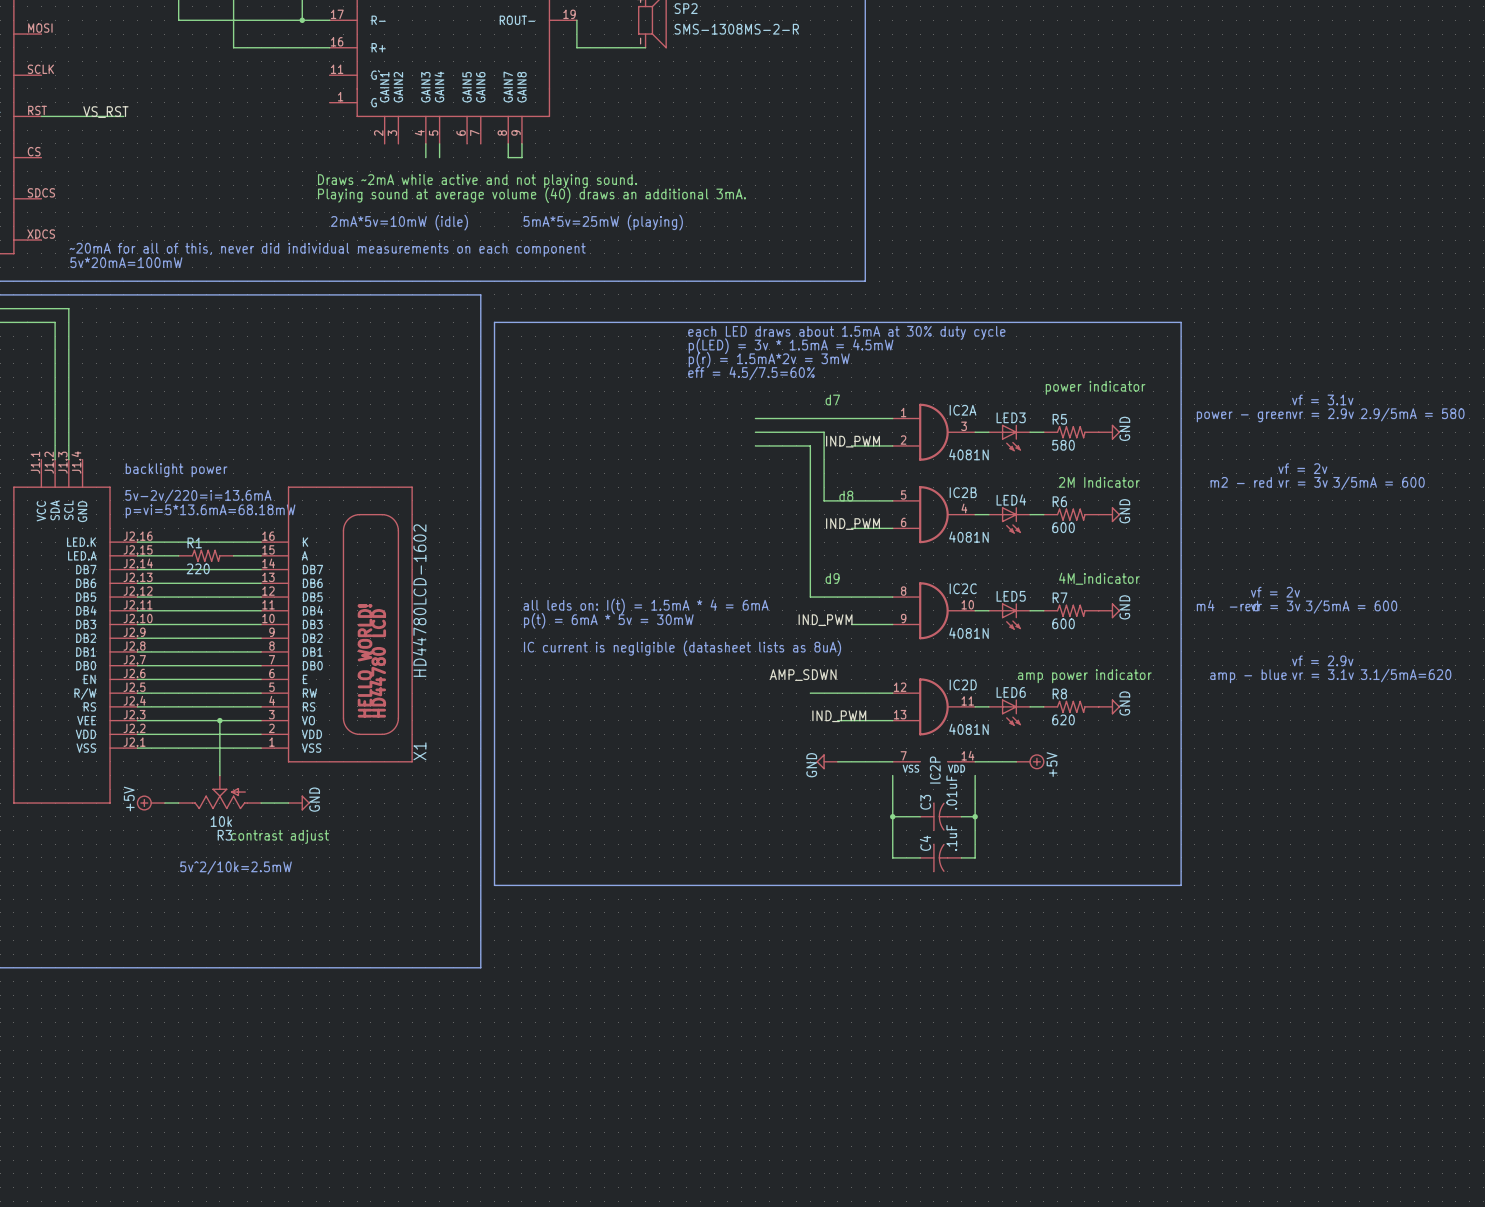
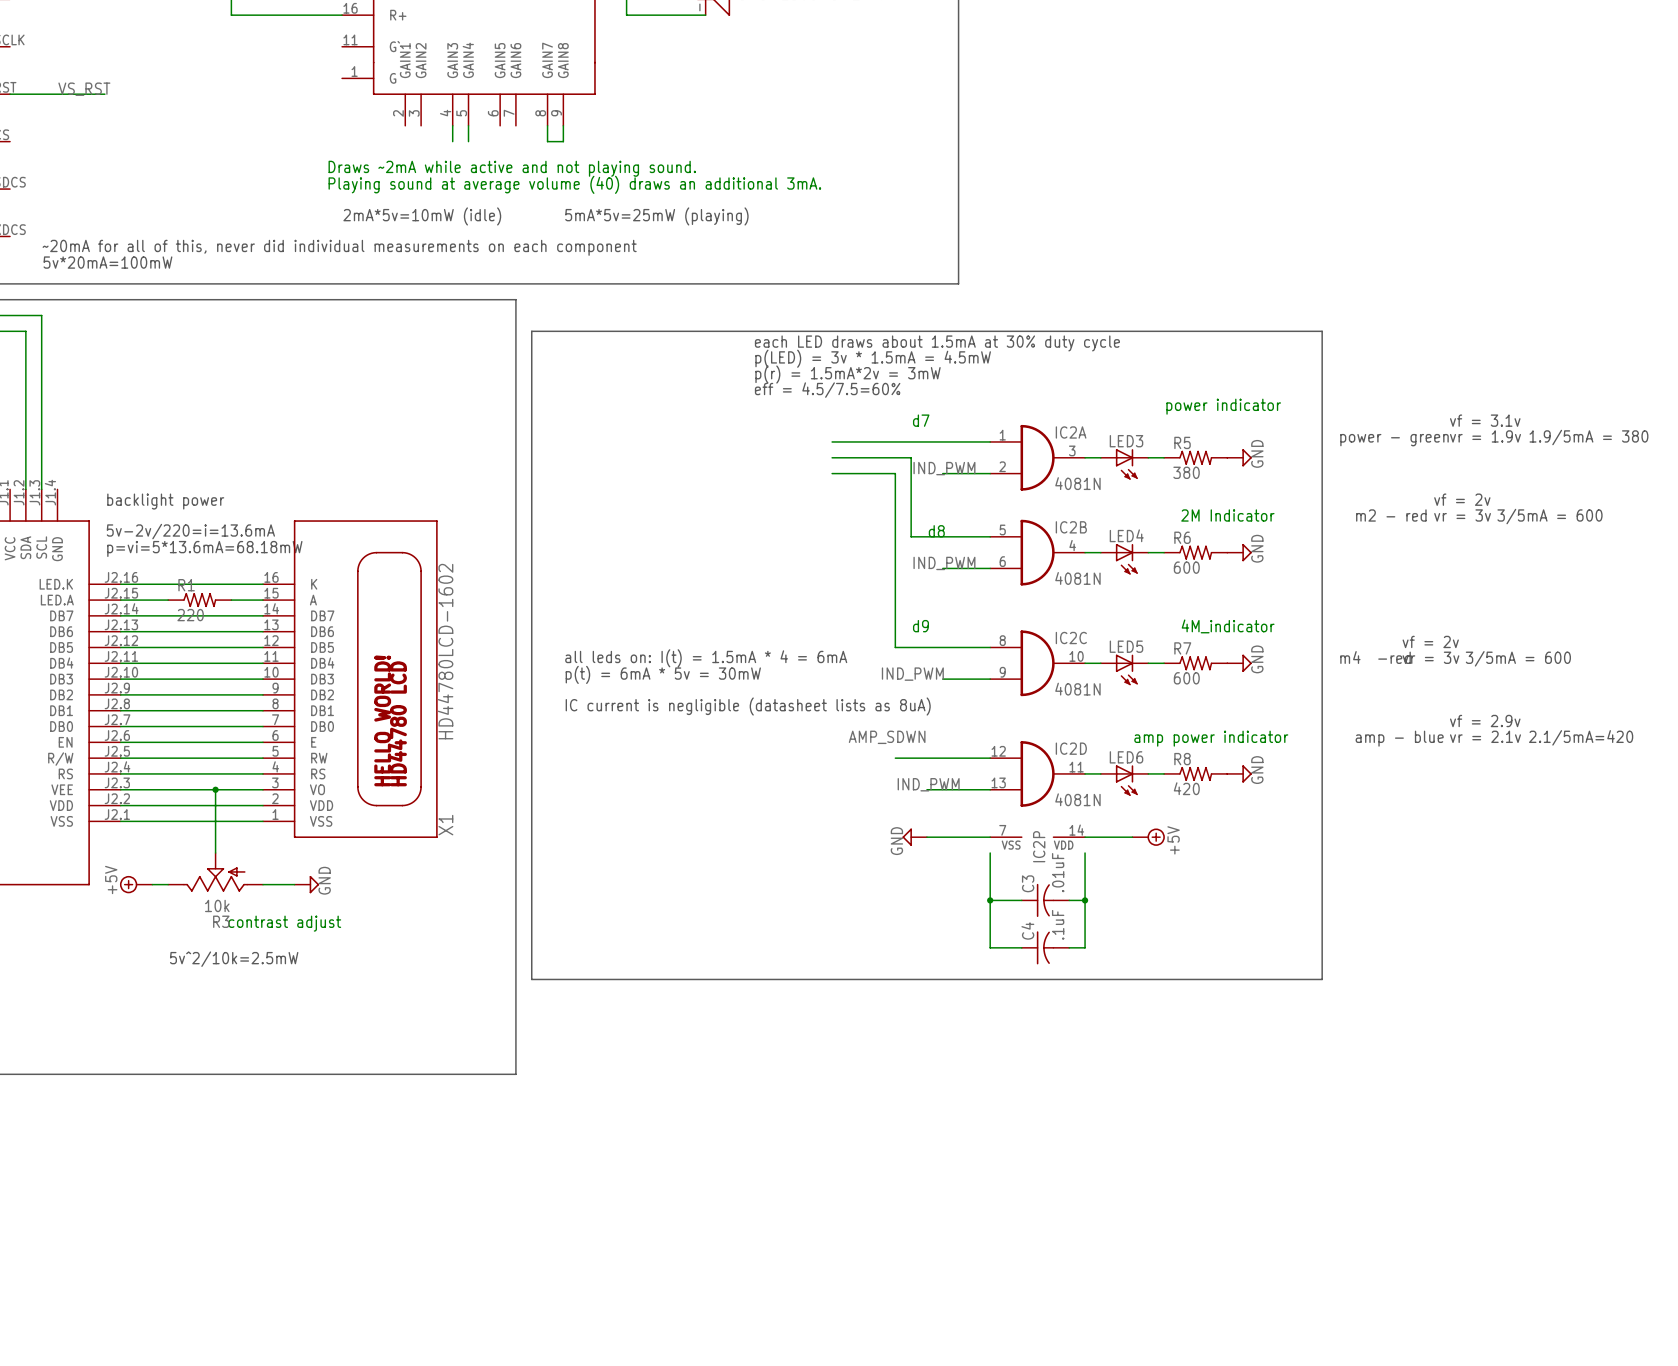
text: vr = 2.9v (1322, 413) -> vr = 1.9v (1485, 436)
text: 2.9/5mA = 580 (1412, 414) -> 1.9/5mA = 380 (1588, 437)
R5 value: 580 (1063, 445) -> 380 (1186, 472)
text: vr = 3.1v (1322, 674) -> vr = 2.1v (1485, 736)
text: 3.1/5mA=620 (1406, 675) -> 2.1/5mA=420 (1581, 737)
R8 value: 620 (1063, 719) -> 420 (1186, 788)

